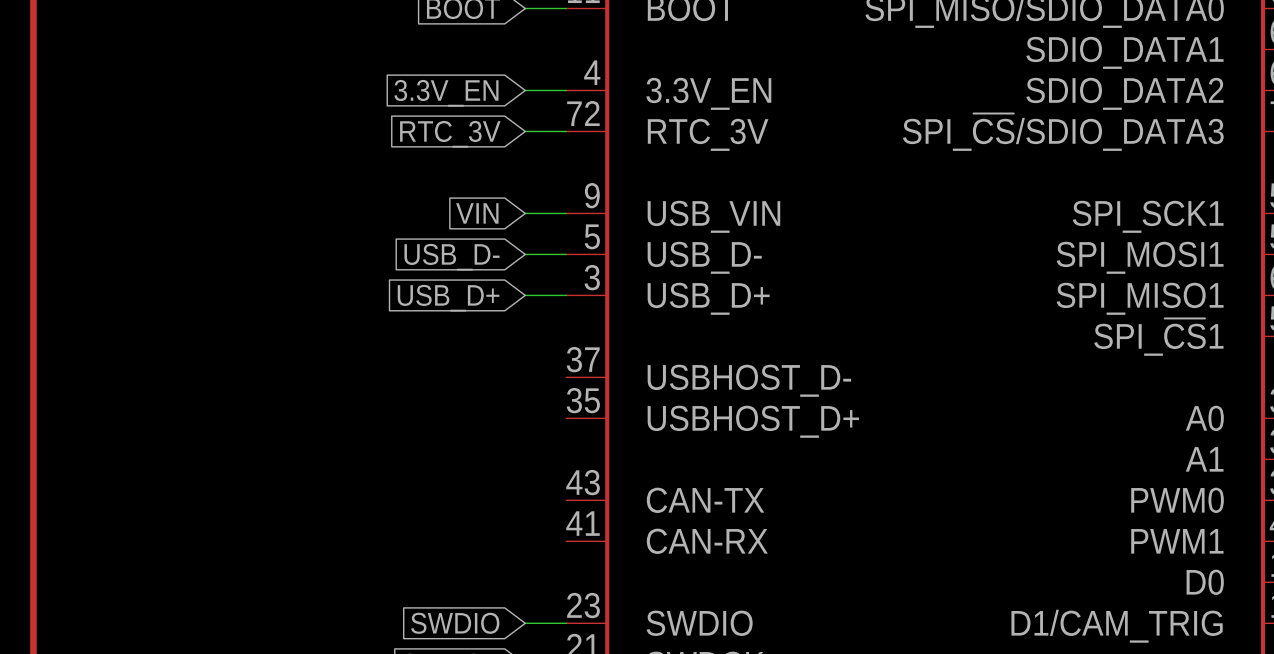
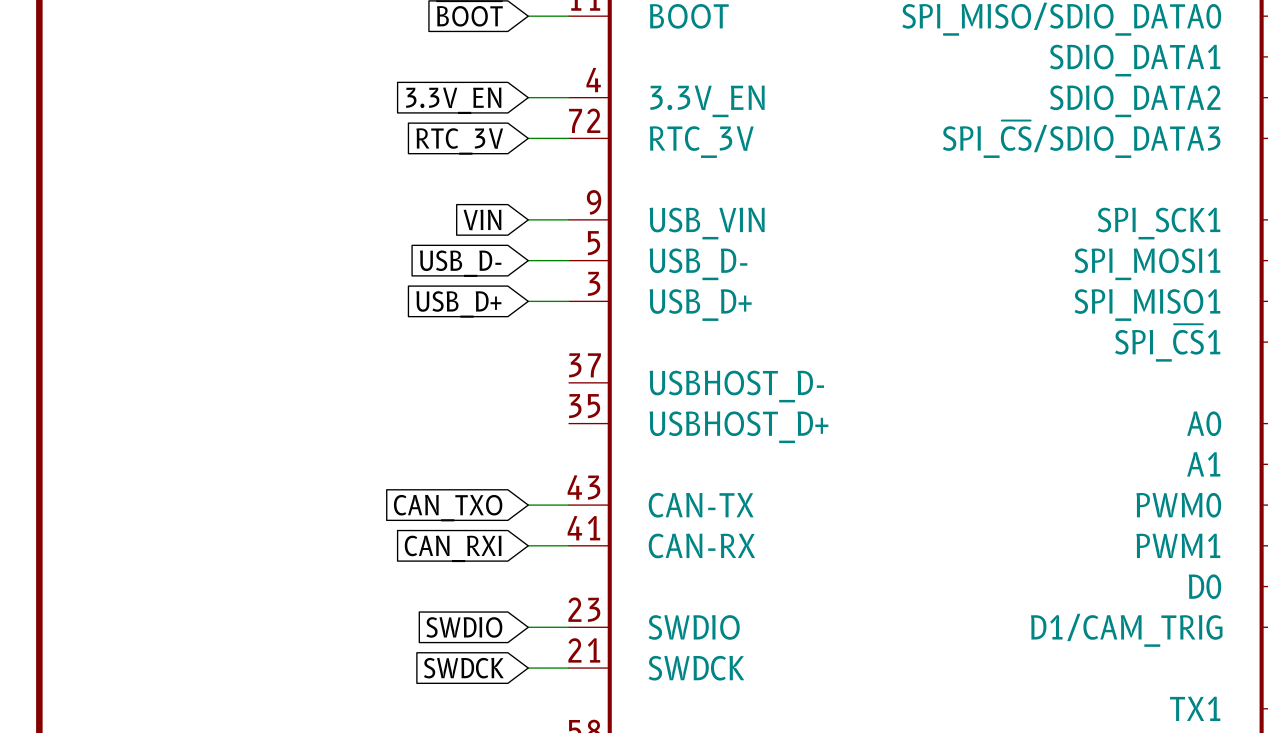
wire: none -> (528, 505) (569, 505)
global label: none -> CAN_TXO (448, 508)
wire: none -> (528, 545) (569, 545)
global label: none -> CAN_RXI (453, 548)

